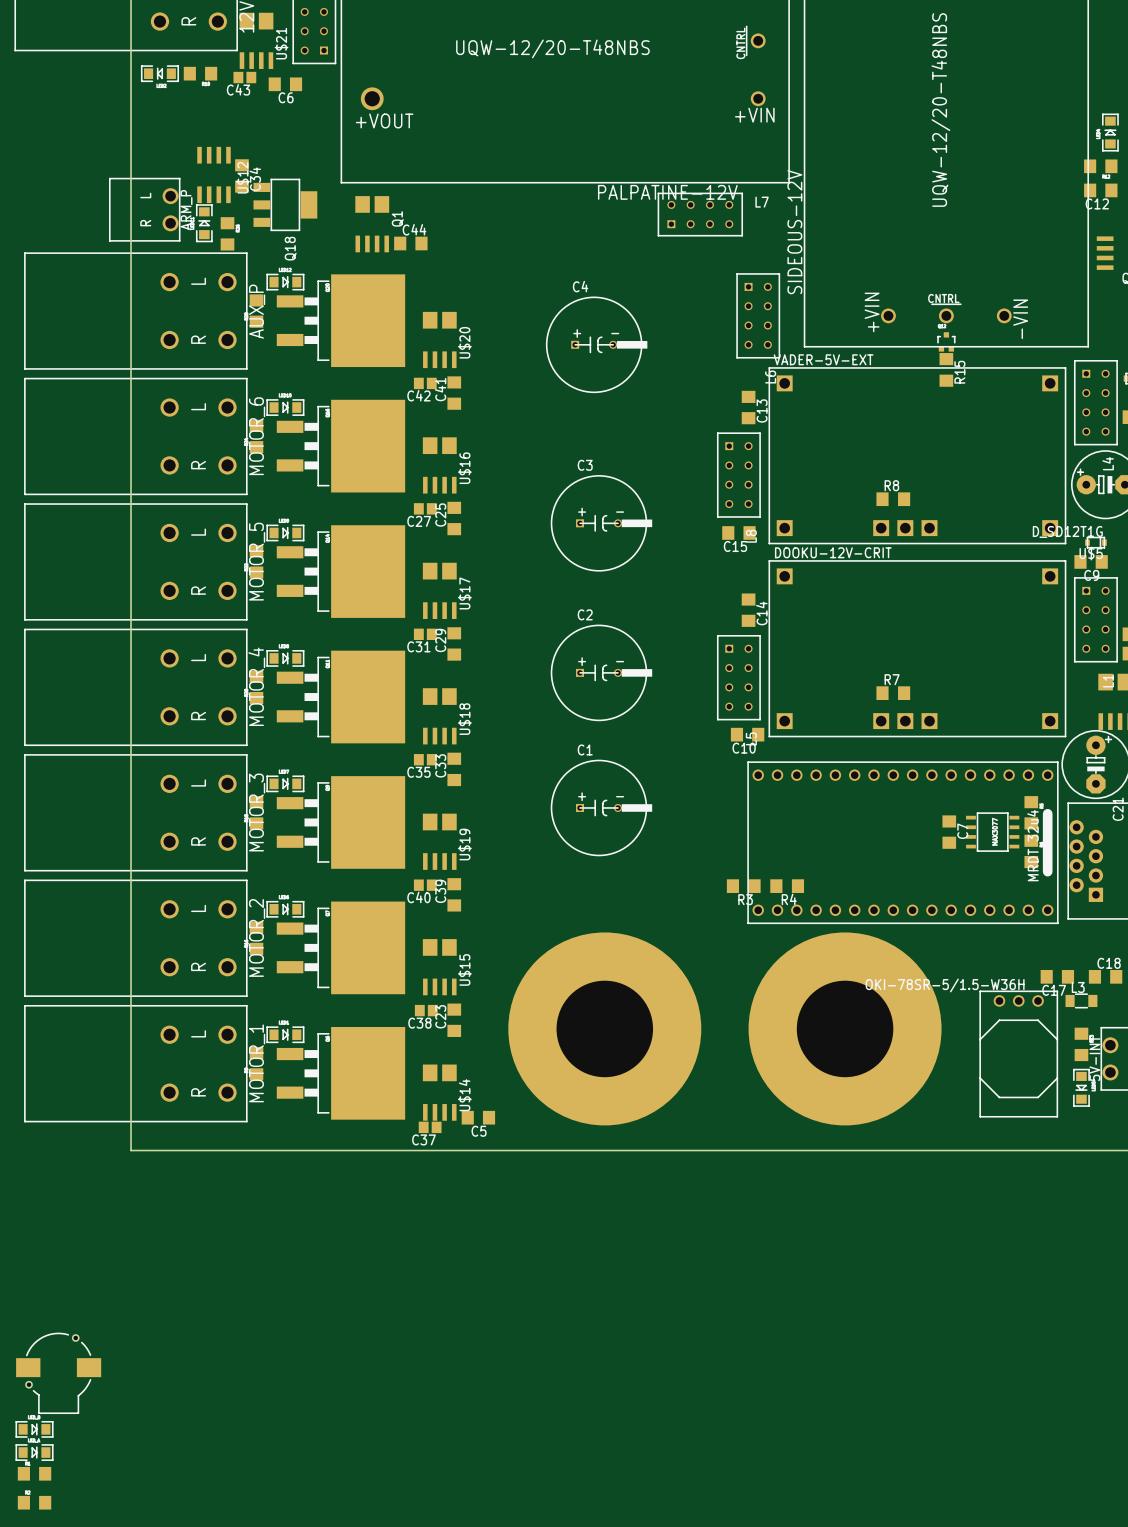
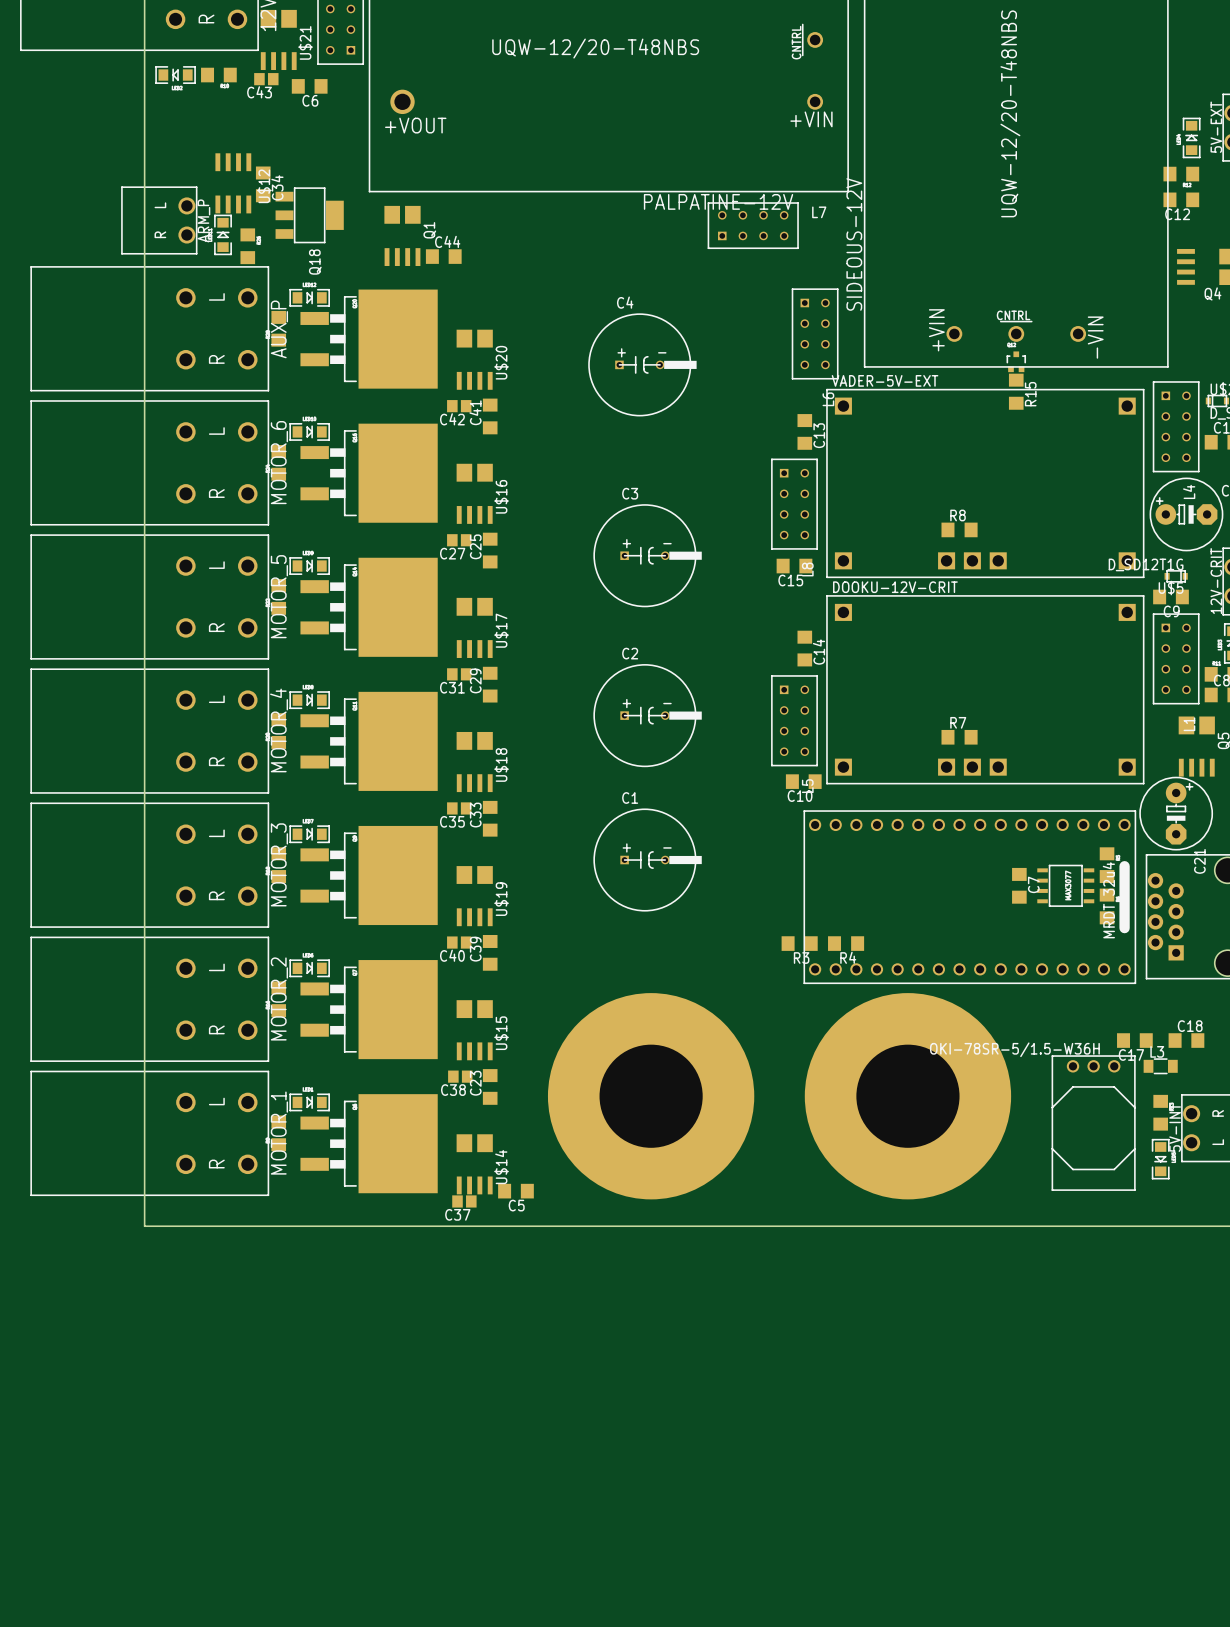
part: (58, 1373) -> none
part: (34, 1429) -> none
part: (34, 1452) -> none
part: (34, 1473) -> none
part: (34, 1502) -> none

